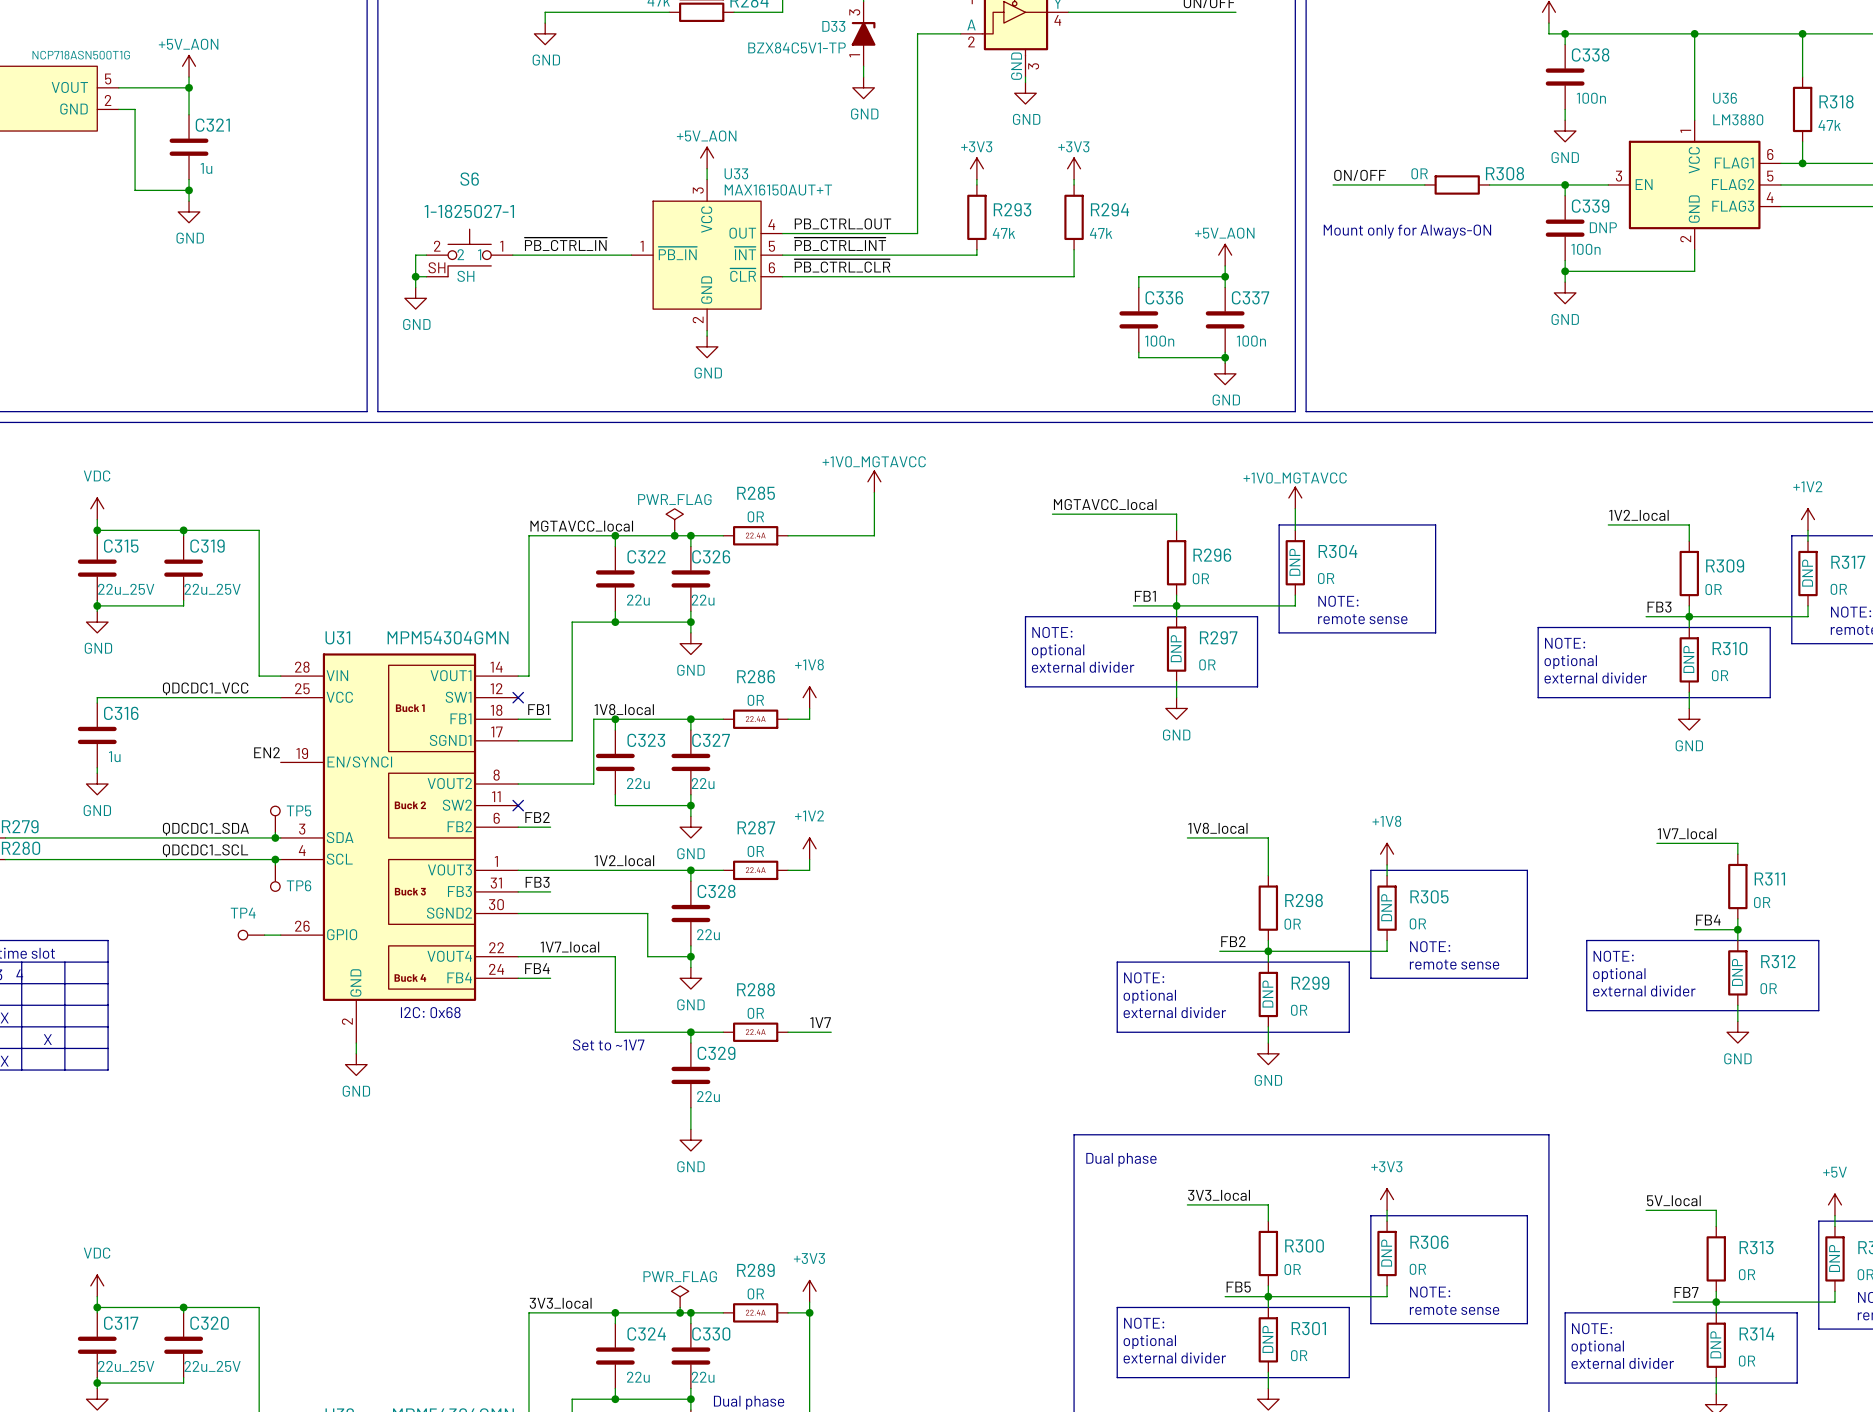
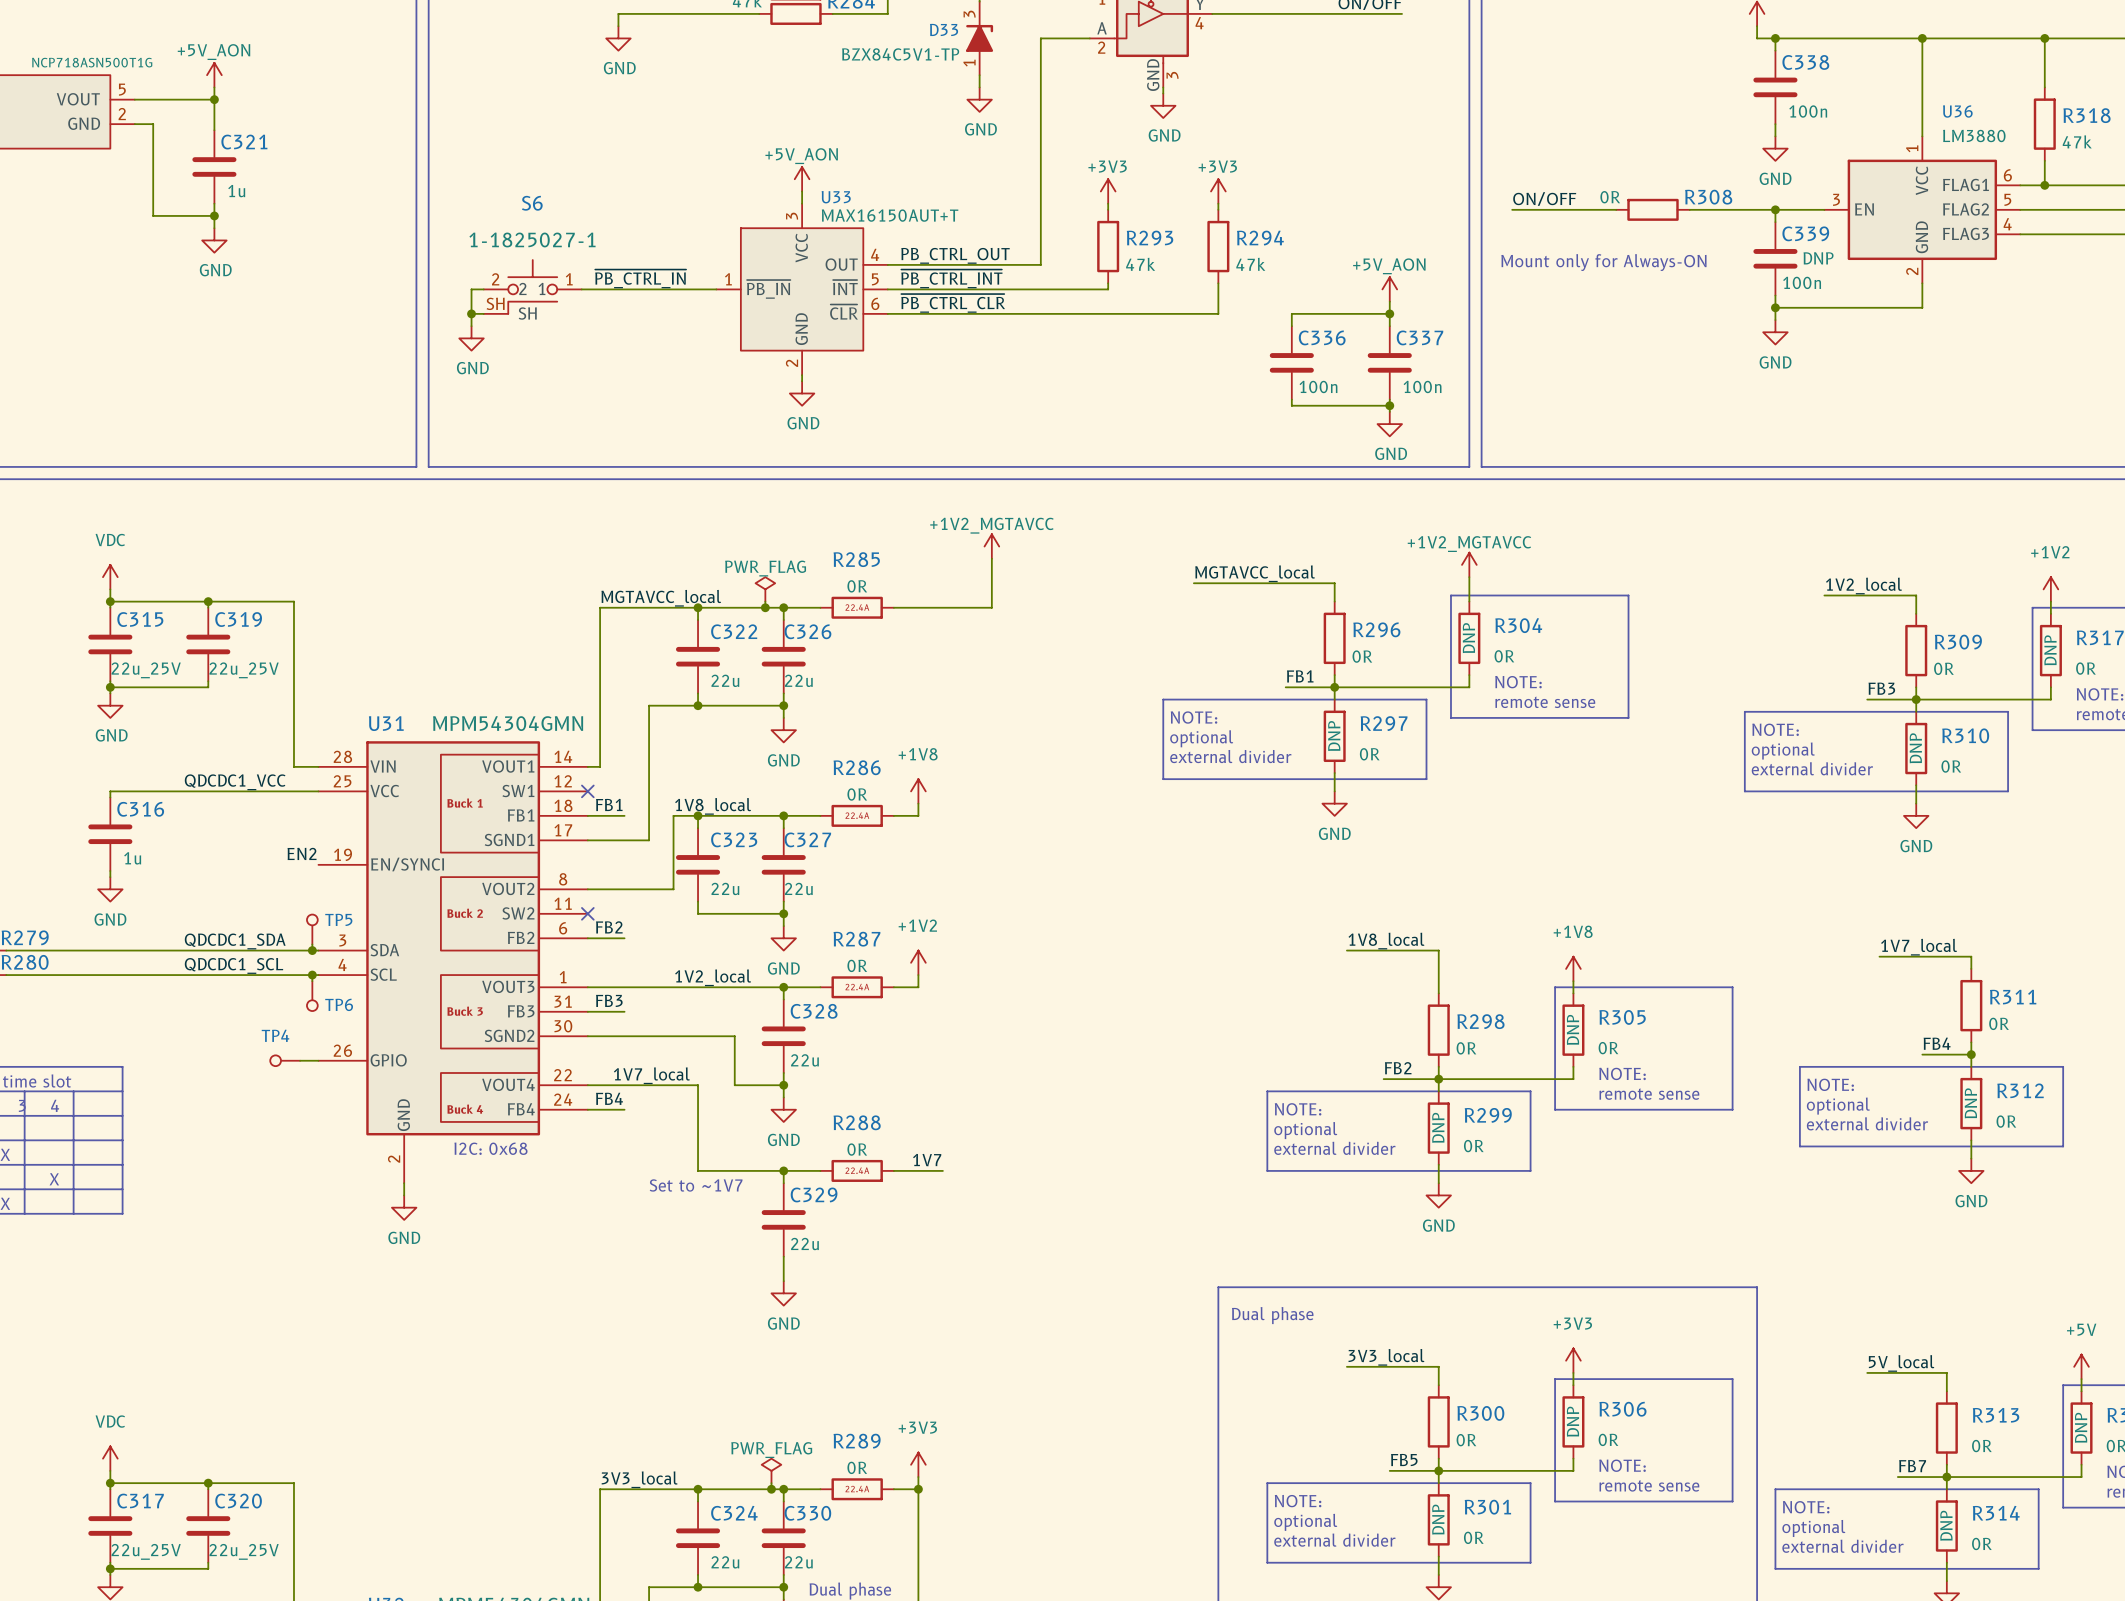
power symbol: +1V0_MGTAVCC (874, 481) -> +1V2_MGTAVCC (991, 546)
power symbol: +1V0_MGTAVCC (1295, 497) -> +1V2_MGTAVCC (1469, 564)

